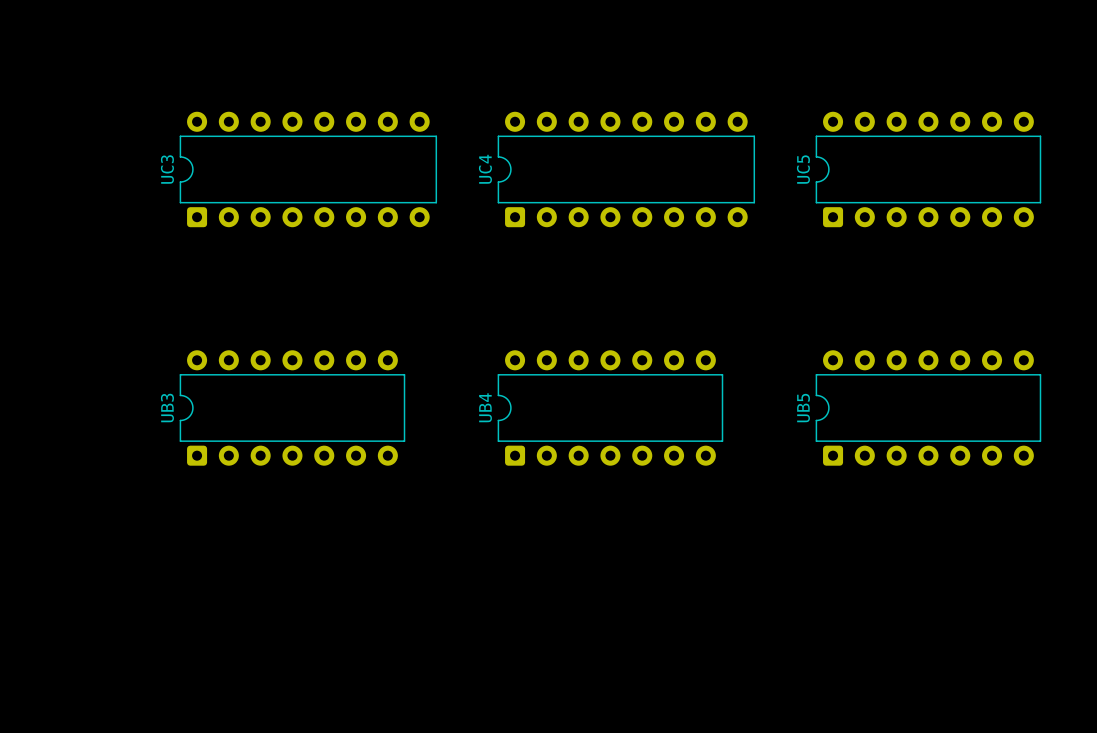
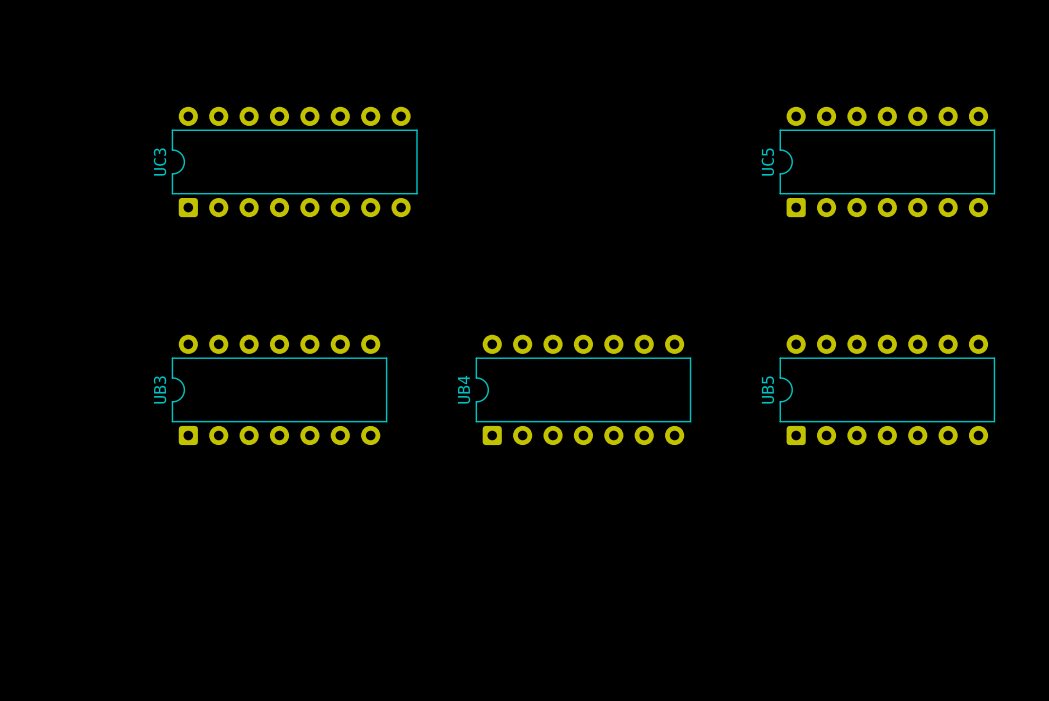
UC4: (626, 169) -> none

